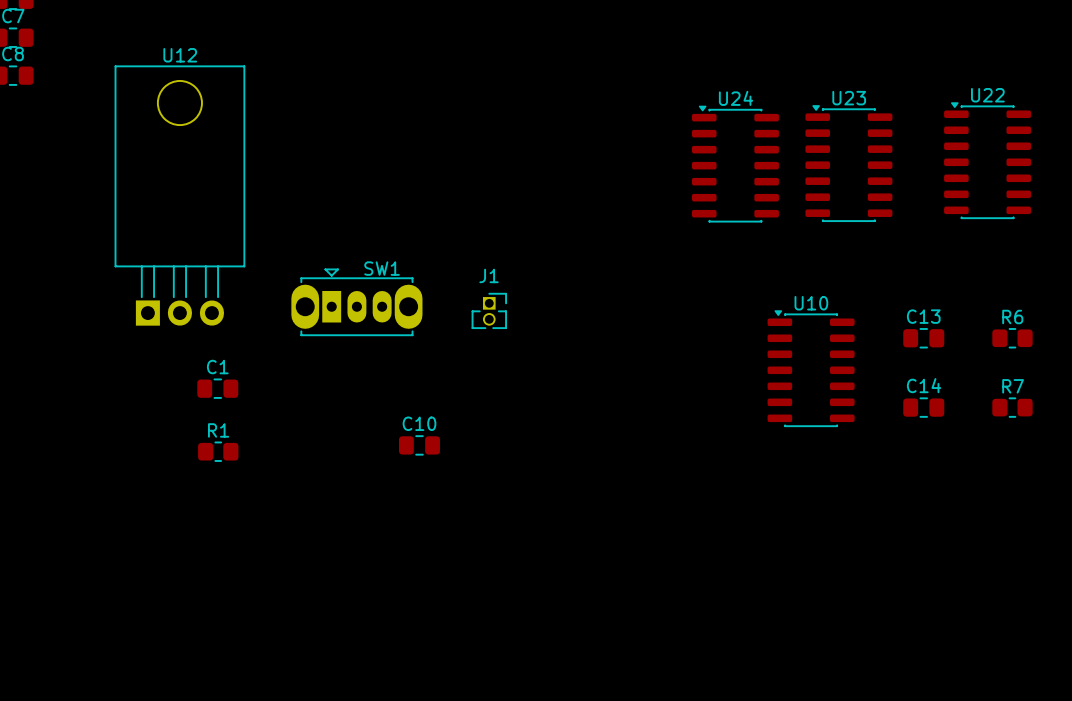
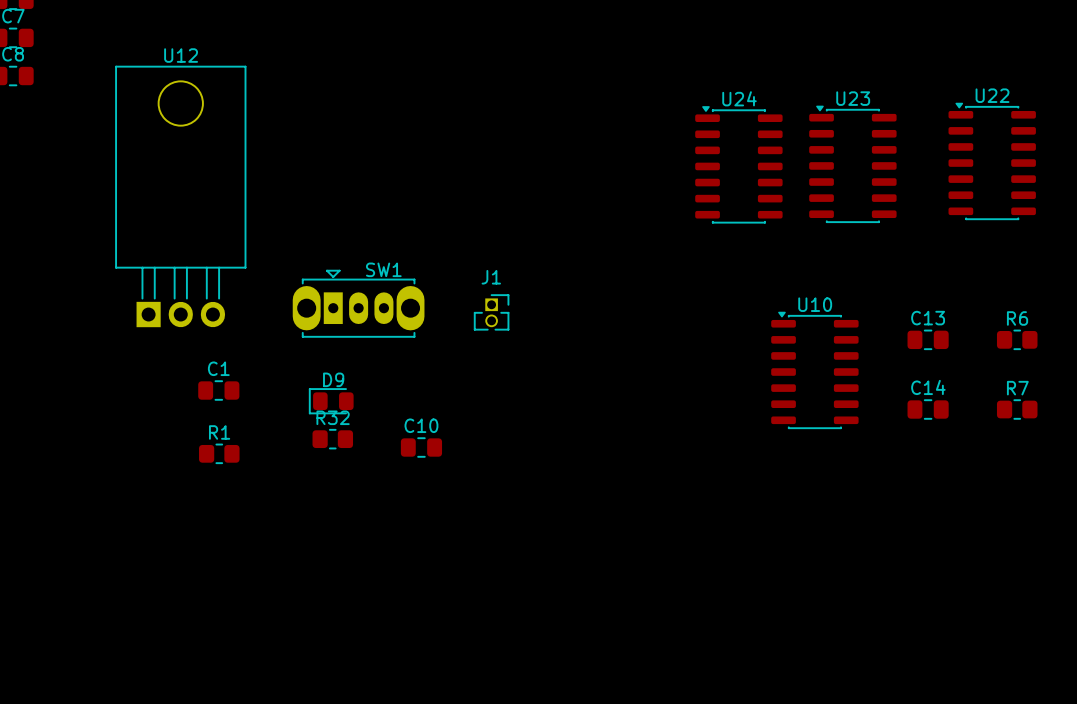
D9: none -> (331, 401)
R32: none -> (332, 439)

